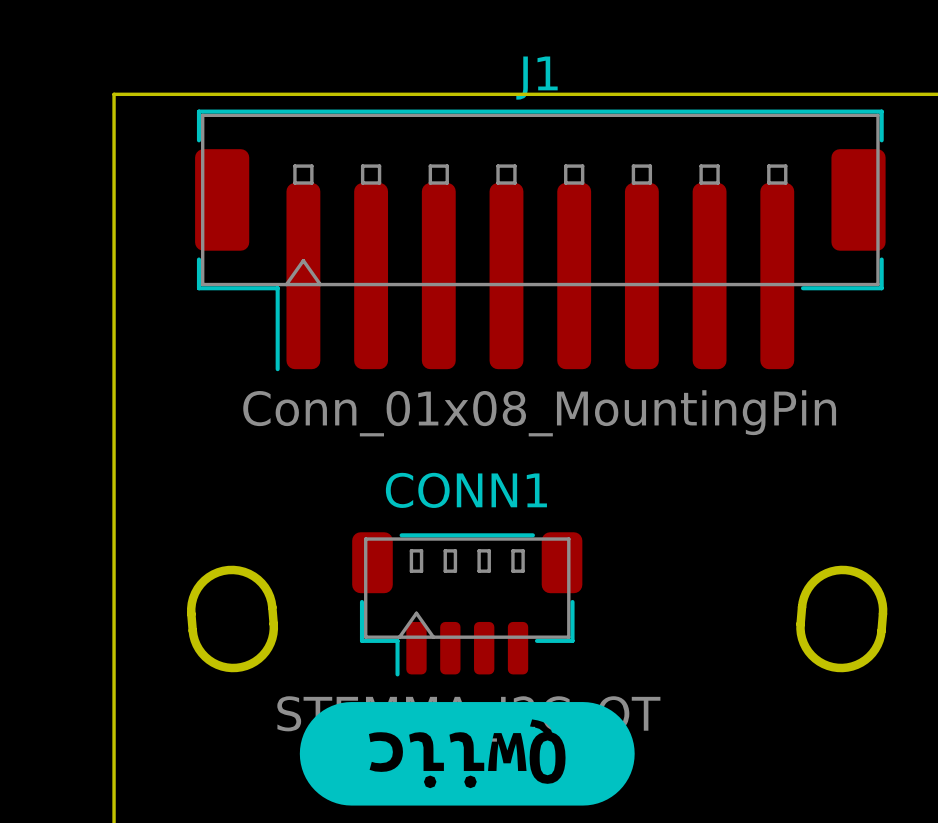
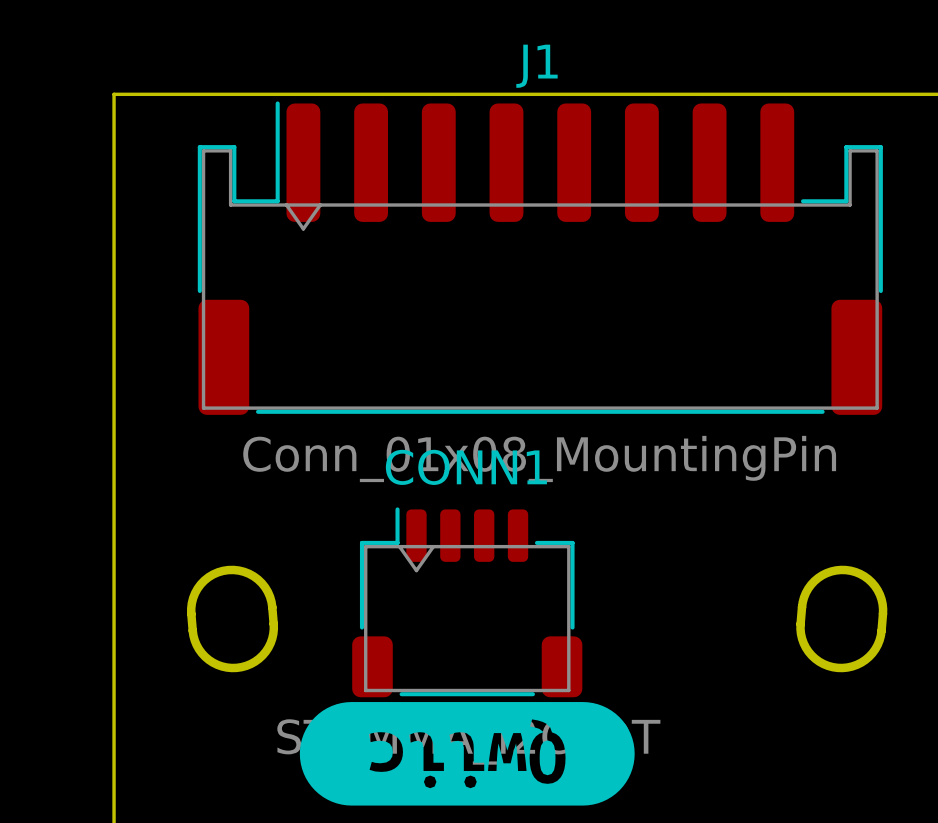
J1 footprint: [195, 109, 886, 372] -> [197, 101, 883, 415]
CONN1 footprint: [352, 532, 583, 677] -> [352, 507, 583, 698]

